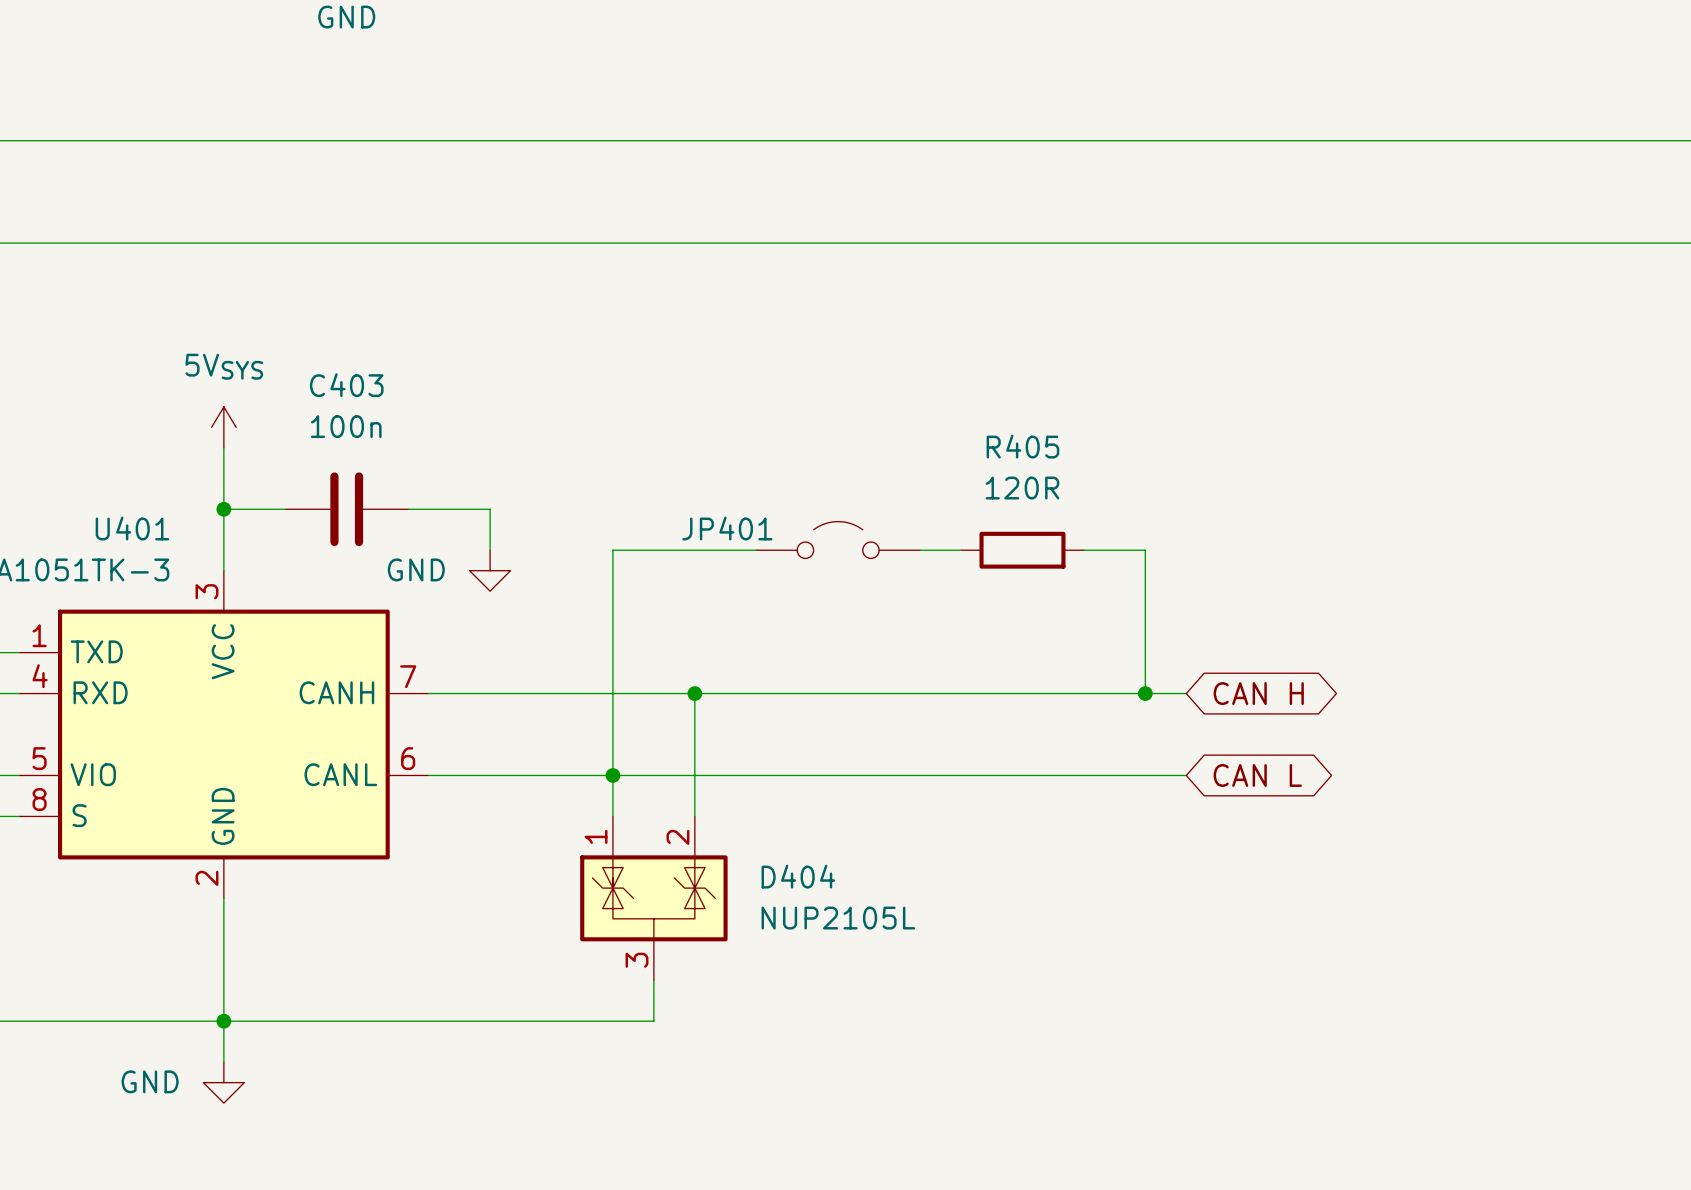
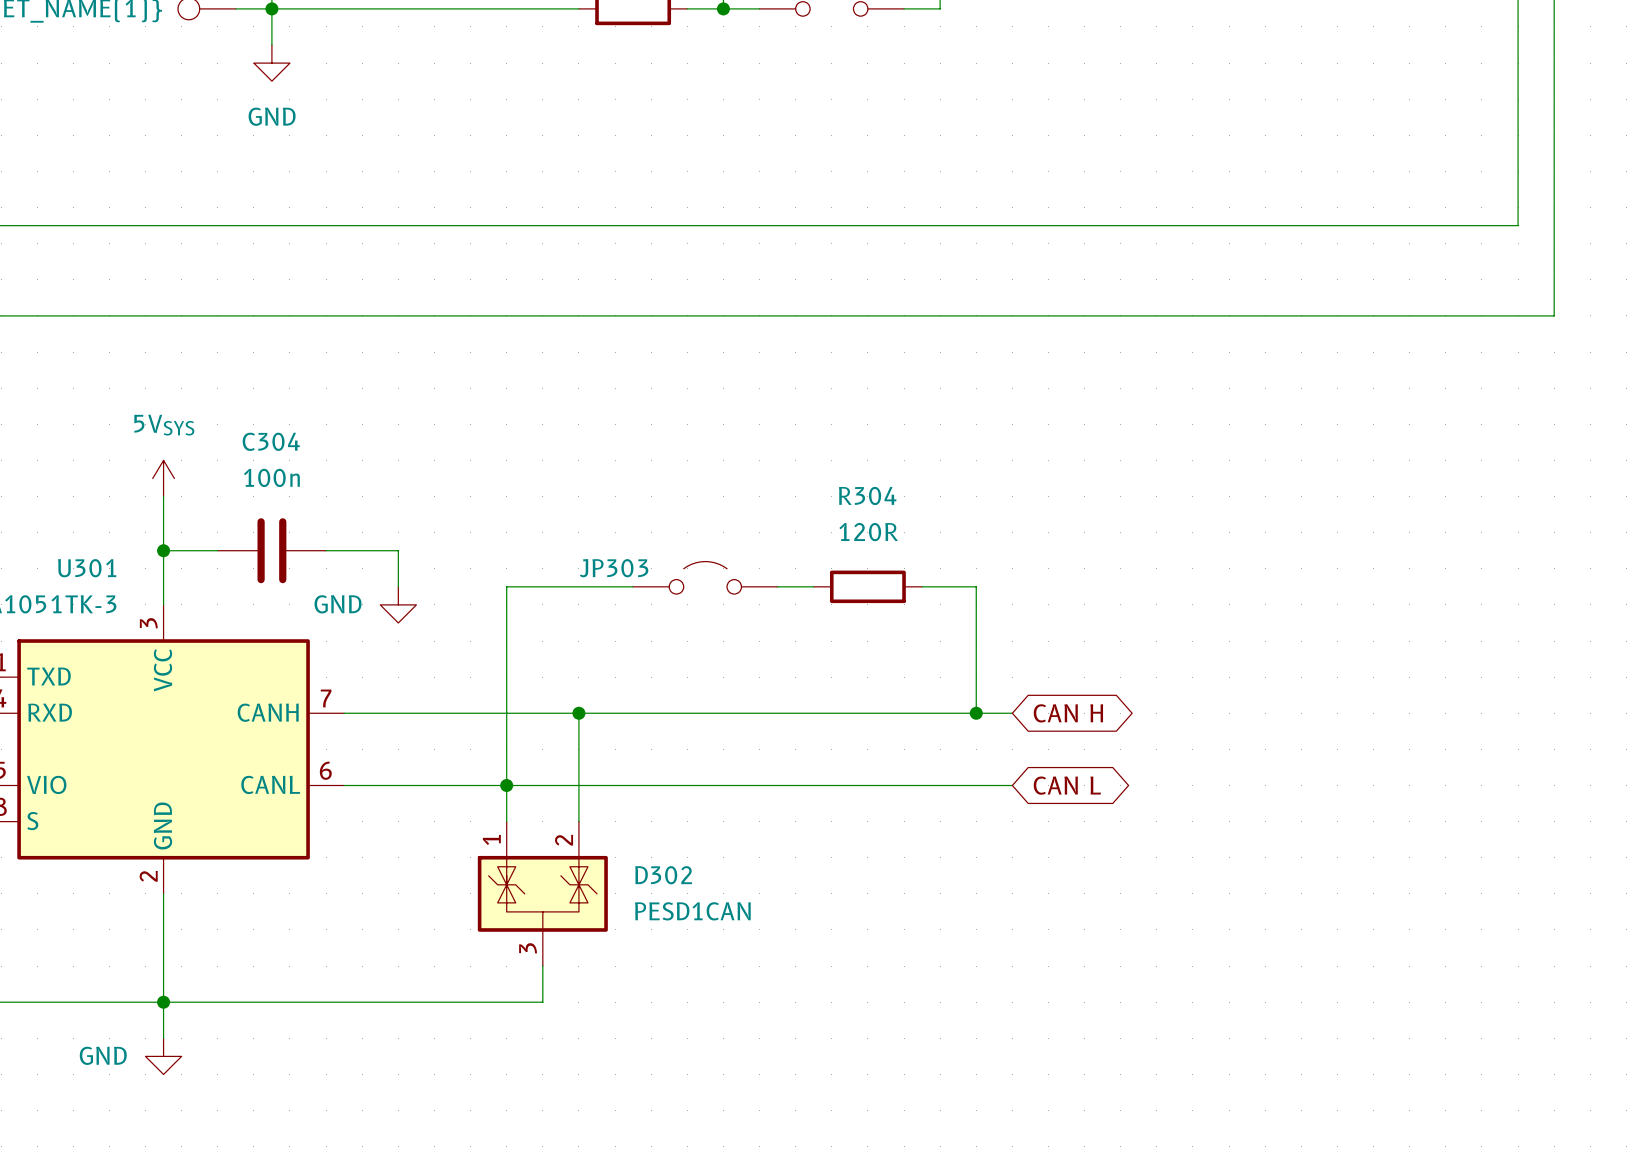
C403 name: C403 (346, 385) -> C304 (271, 441)
R405 name: R405 (1022, 446) -> R304 (867, 495)
U401 name: U401 (132, 528) -> U301 (87, 568)
JP401 name: JP401 (727, 528) -> JP303 (614, 568)
D404 name: D404 (798, 876) -> D302 (663, 875)
D404 value: NUP2105L (838, 918) -> PESD1CAN (692, 911)

